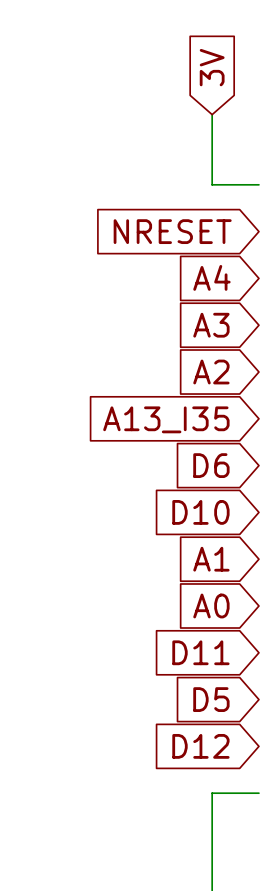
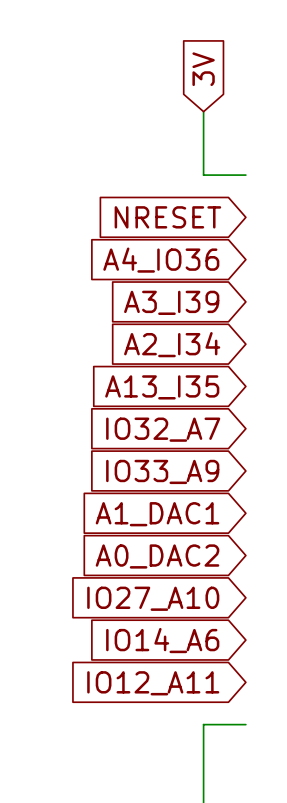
global label: A4 (211, 277) -> A4_IO36 (161, 260)
global label: A3 (211, 325) -> A3_I39 (171, 302)
global label: A2 (211, 372) -> A2_I34 (172, 344)
global label: D6 (211, 465) -> IO32_A7 (163, 429)
global label: D10 (200, 512) -> IO33_A9 (162, 471)
global label: A1 (211, 559) -> A1_DAC1 (157, 514)
global label: A0 (211, 605) -> A0_DAC2 (157, 556)
global label: D11 (200, 652) -> IO27_A10 (153, 598)
global label: D5 (211, 699) -> IO14_A6 (162, 640)
global label: D12 (200, 746) -> IO12_A11 (153, 683)

